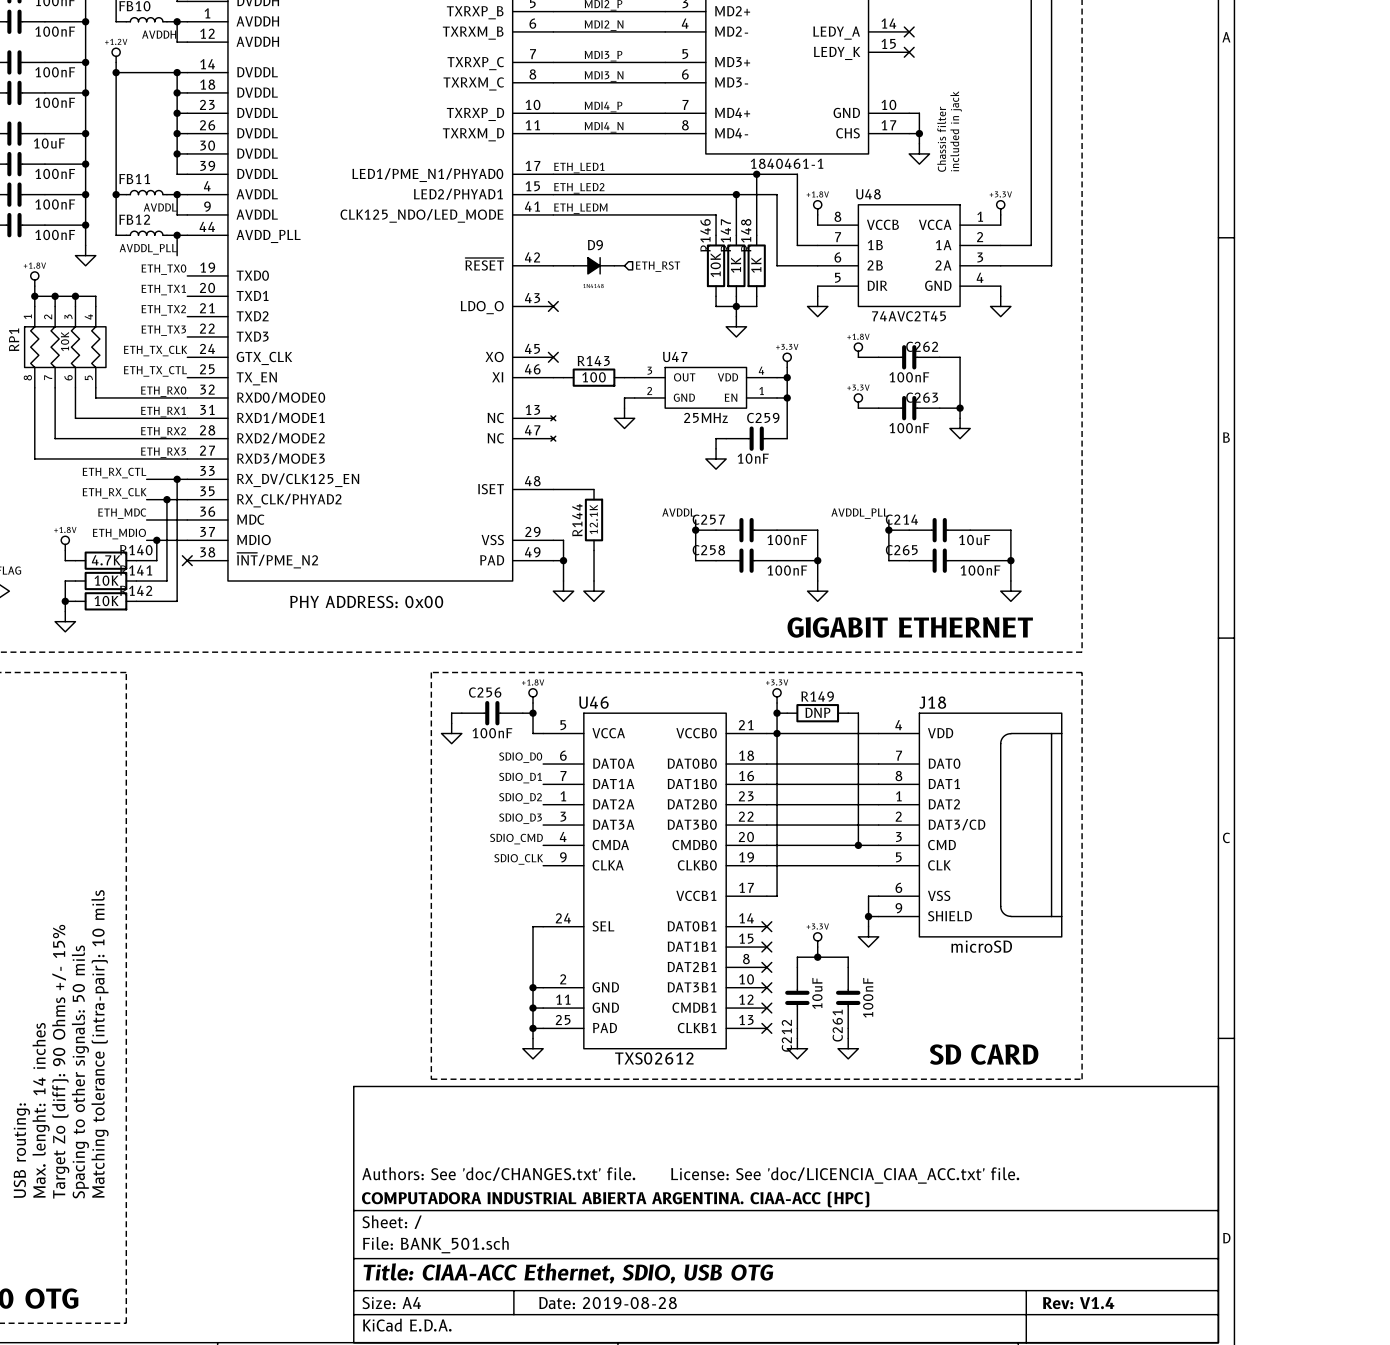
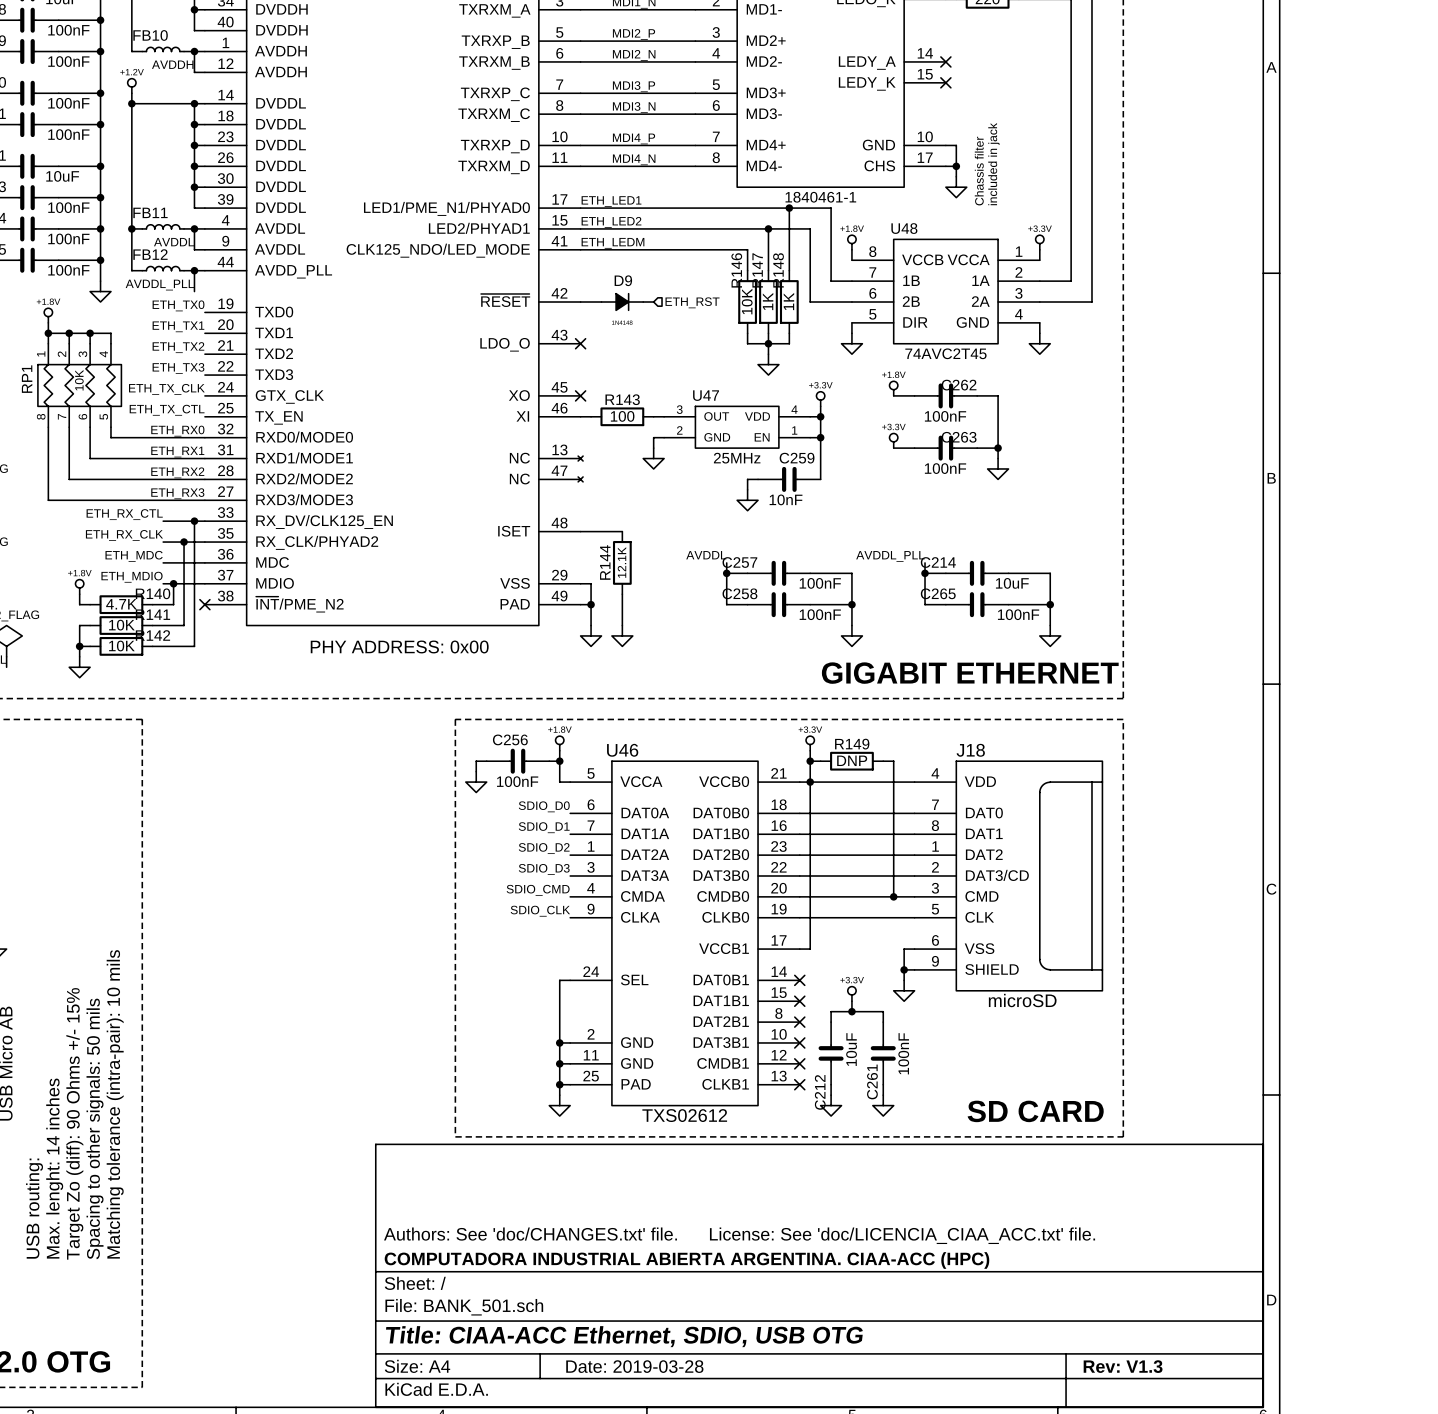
title block: Date: 2019-08-28 (608, 1303) -> Date: 2019-03-28 (634, 1366)
title block: Rev: V1.4 (1078, 1303) -> Rev: V1.3 (1123, 1366)

